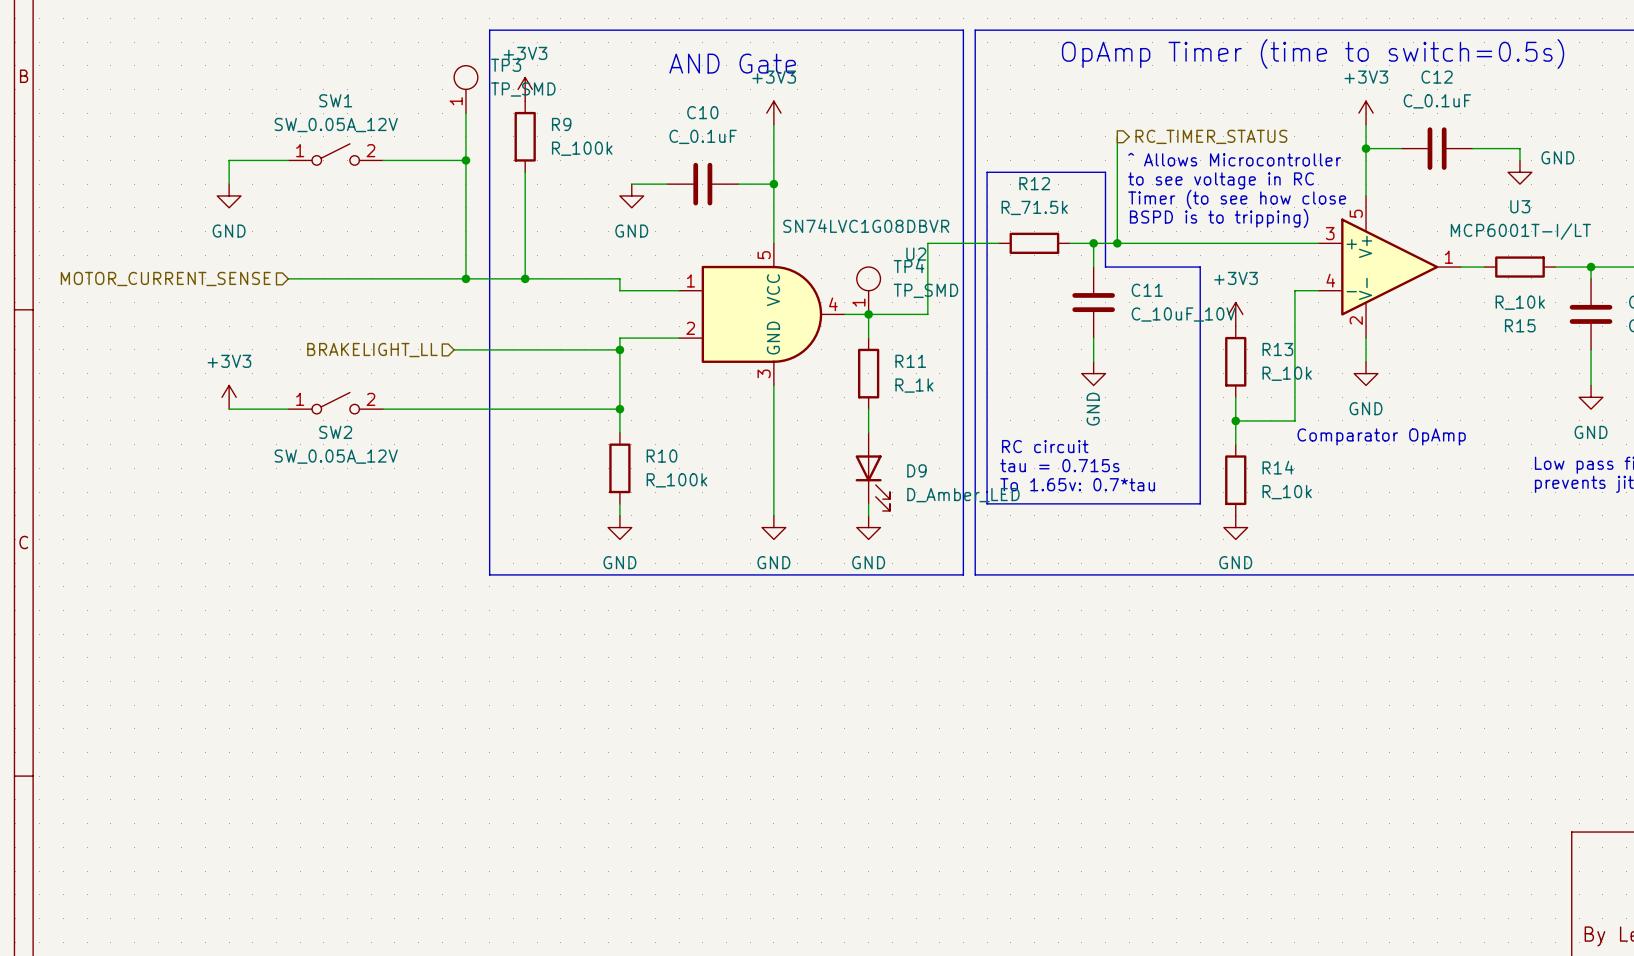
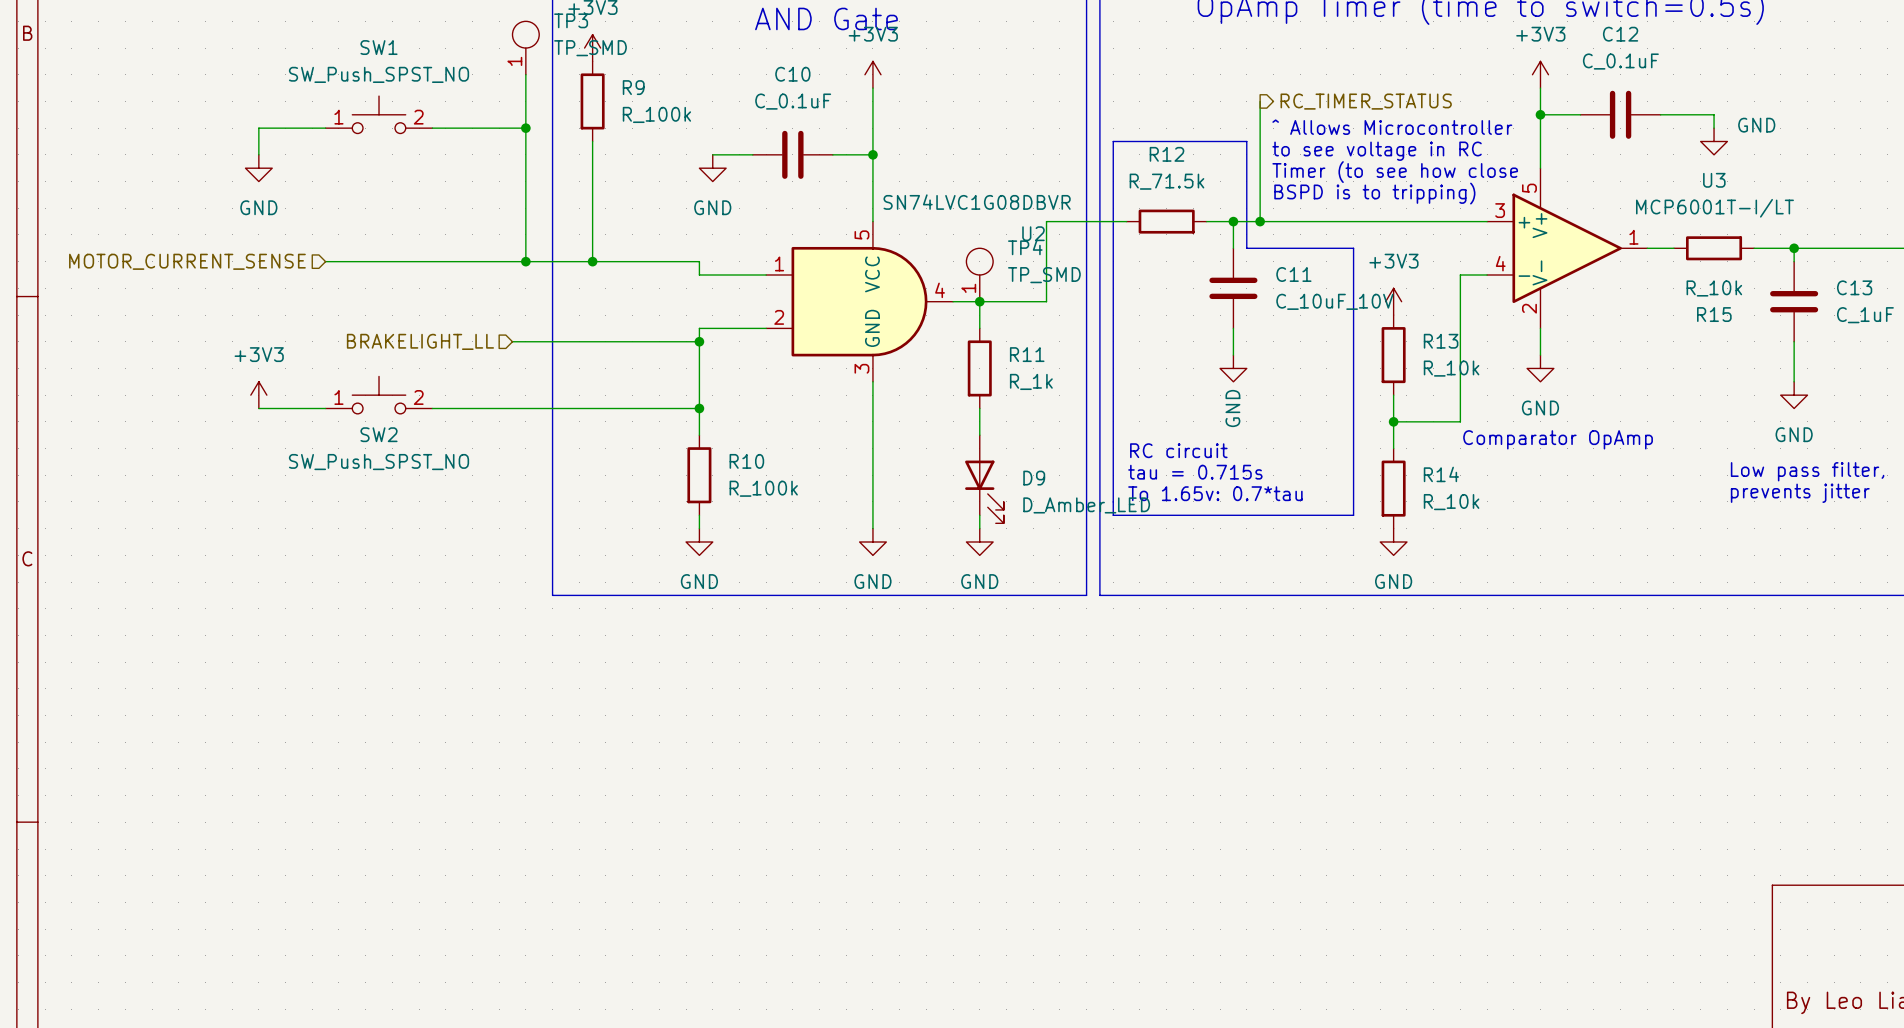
SW1 value: SW_0.05A_12V (336, 125) -> SW_Push_SPST_NO (379, 74)
SW1 symbol: [288, 143, 384, 166] -> [325, 96, 433, 134]
SW2 symbol: [288, 392, 384, 414] -> [325, 376, 433, 414]
SW2 value: SW_0.05A_12V (336, 456) -> SW_Push_SPST_NO (379, 462)

